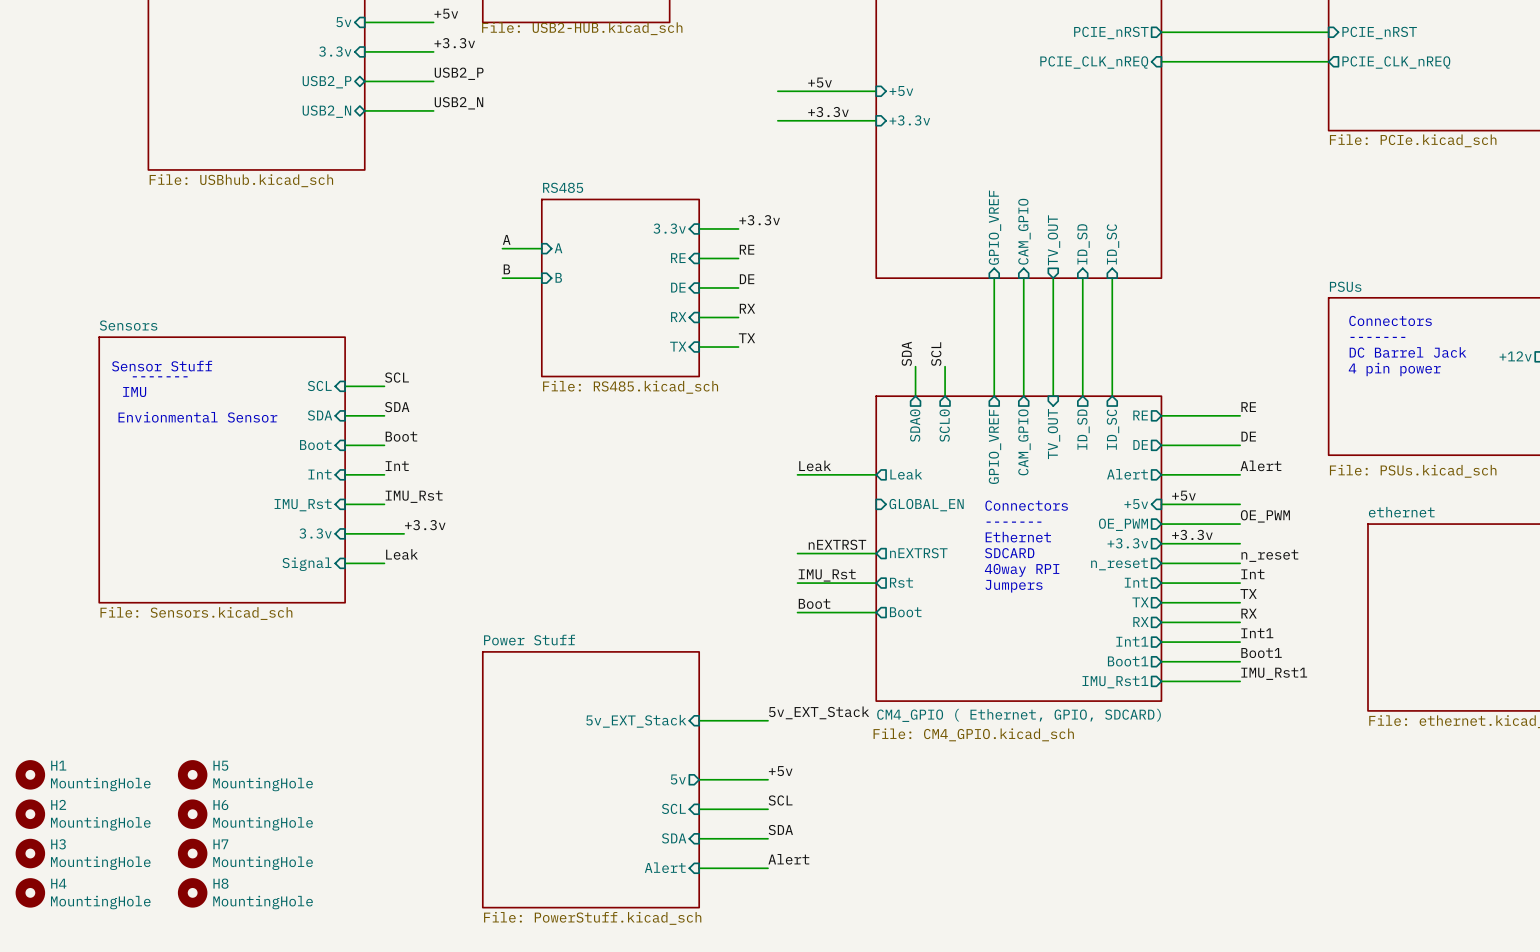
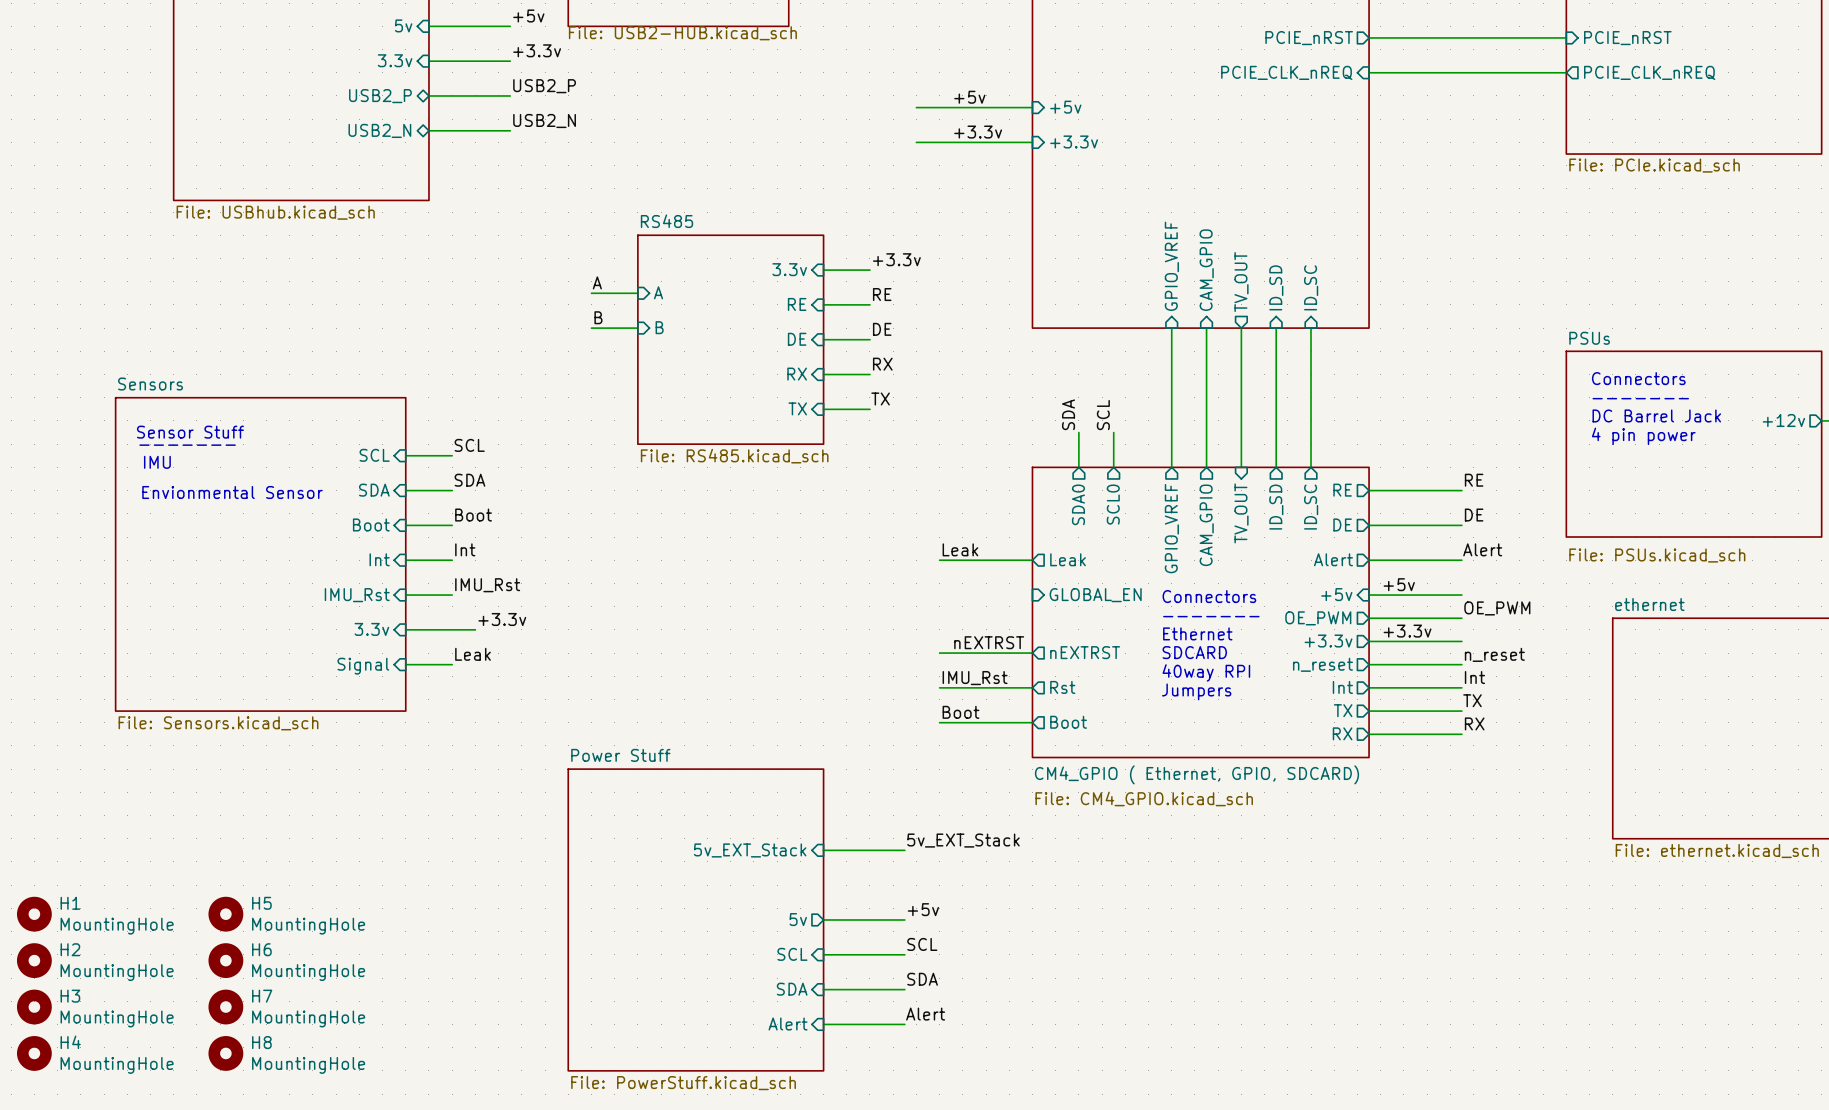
sheet CM4_GPIO ( Ethernet, GPIO, SDCARD) shape: [875, 395, 1163, 702] -> [1031, 466, 1370, 759]
label: Int1 (1257, 633) -> none
sheet pin: Int1 (1132, 641) -> none
wire: (1161, 642) (1240, 642) -> none
label: Boot1 (1261, 653) -> none
sheet pin: Boot1 (1128, 661) -> none
wire: (1161, 661) (1240, 661) -> none
label: IMU_Rst1 (1274, 673) -> none
wire: (1161, 681) (1240, 681) -> none
sheet pin: IMU_Rst1 (1115, 682) -> none
sheet CM4_GPIO ( Ethernet, GPIO, SDCARD) name position: CM4_GPIO ( Ethernet, GPIO, SDCARD) (1019, 715) -> CM4_GPIO ( Ethernet, GPIO, SDCARD) (1196, 774)
sheet CM4_GPIO ( Ethernet, GPIO, SDCARD) value position: File: CM4_GPIO.kicad_sch (973, 734) -> File: CM4_GPIO.kicad_sch (1144, 798)

